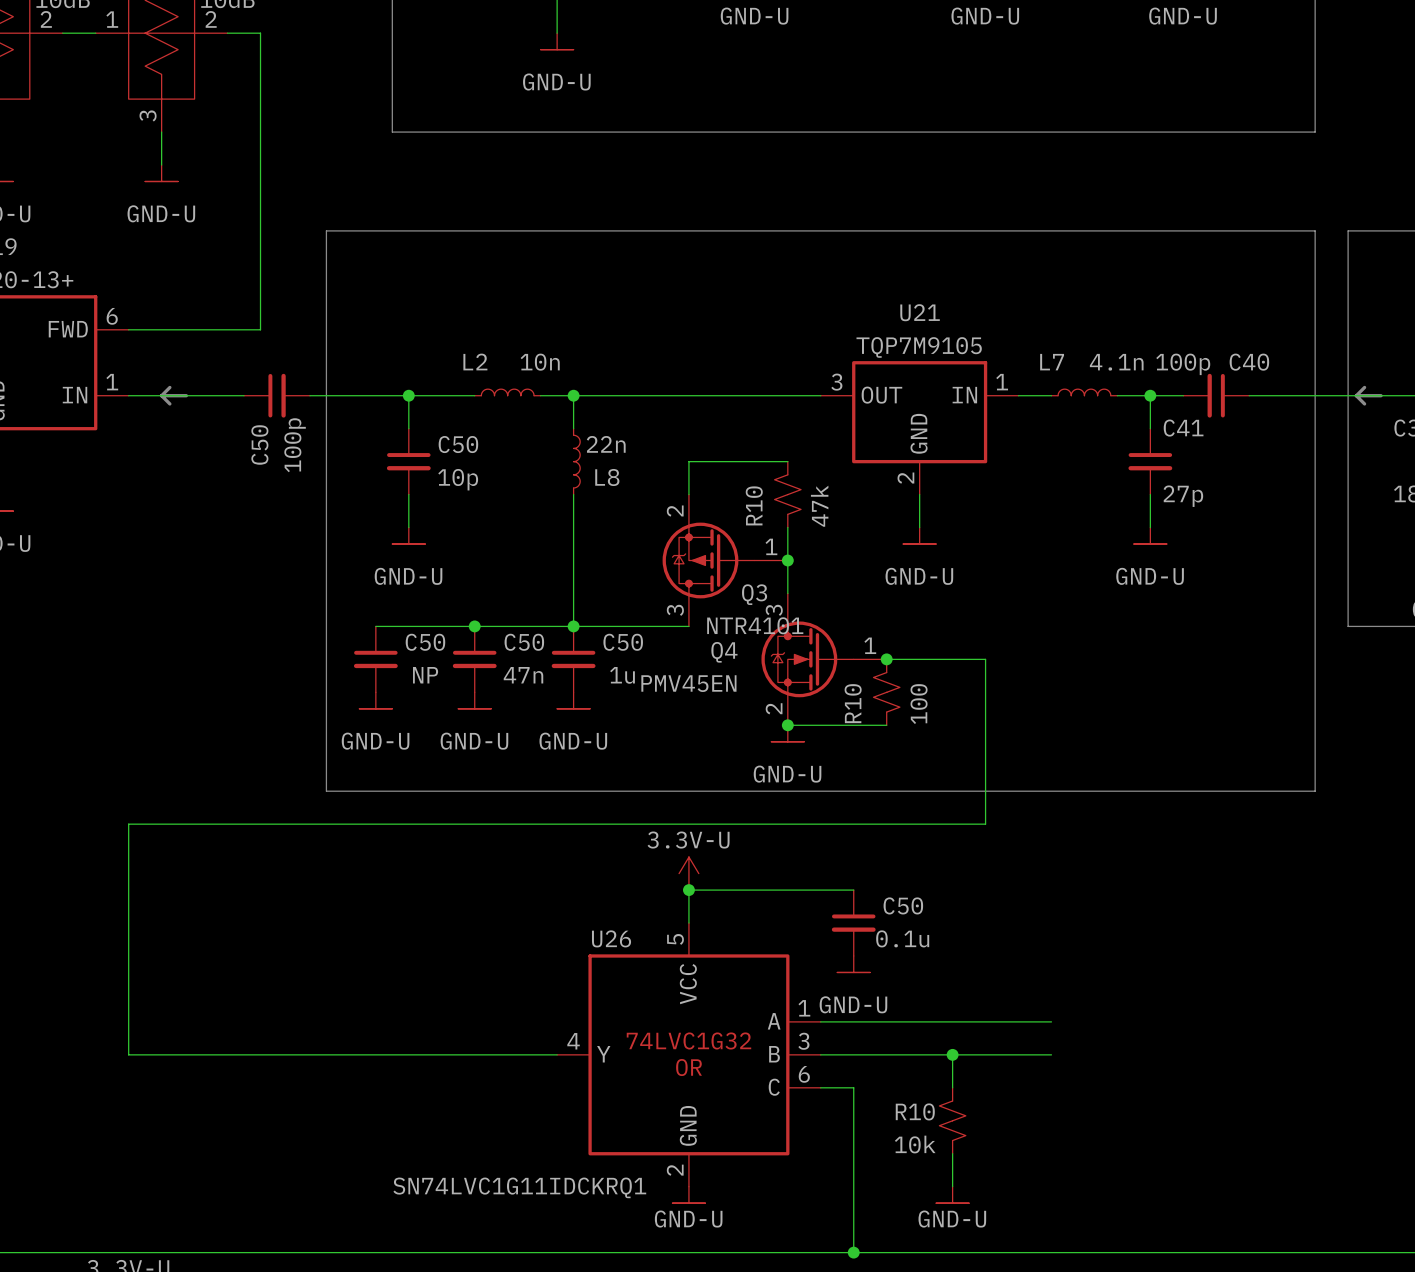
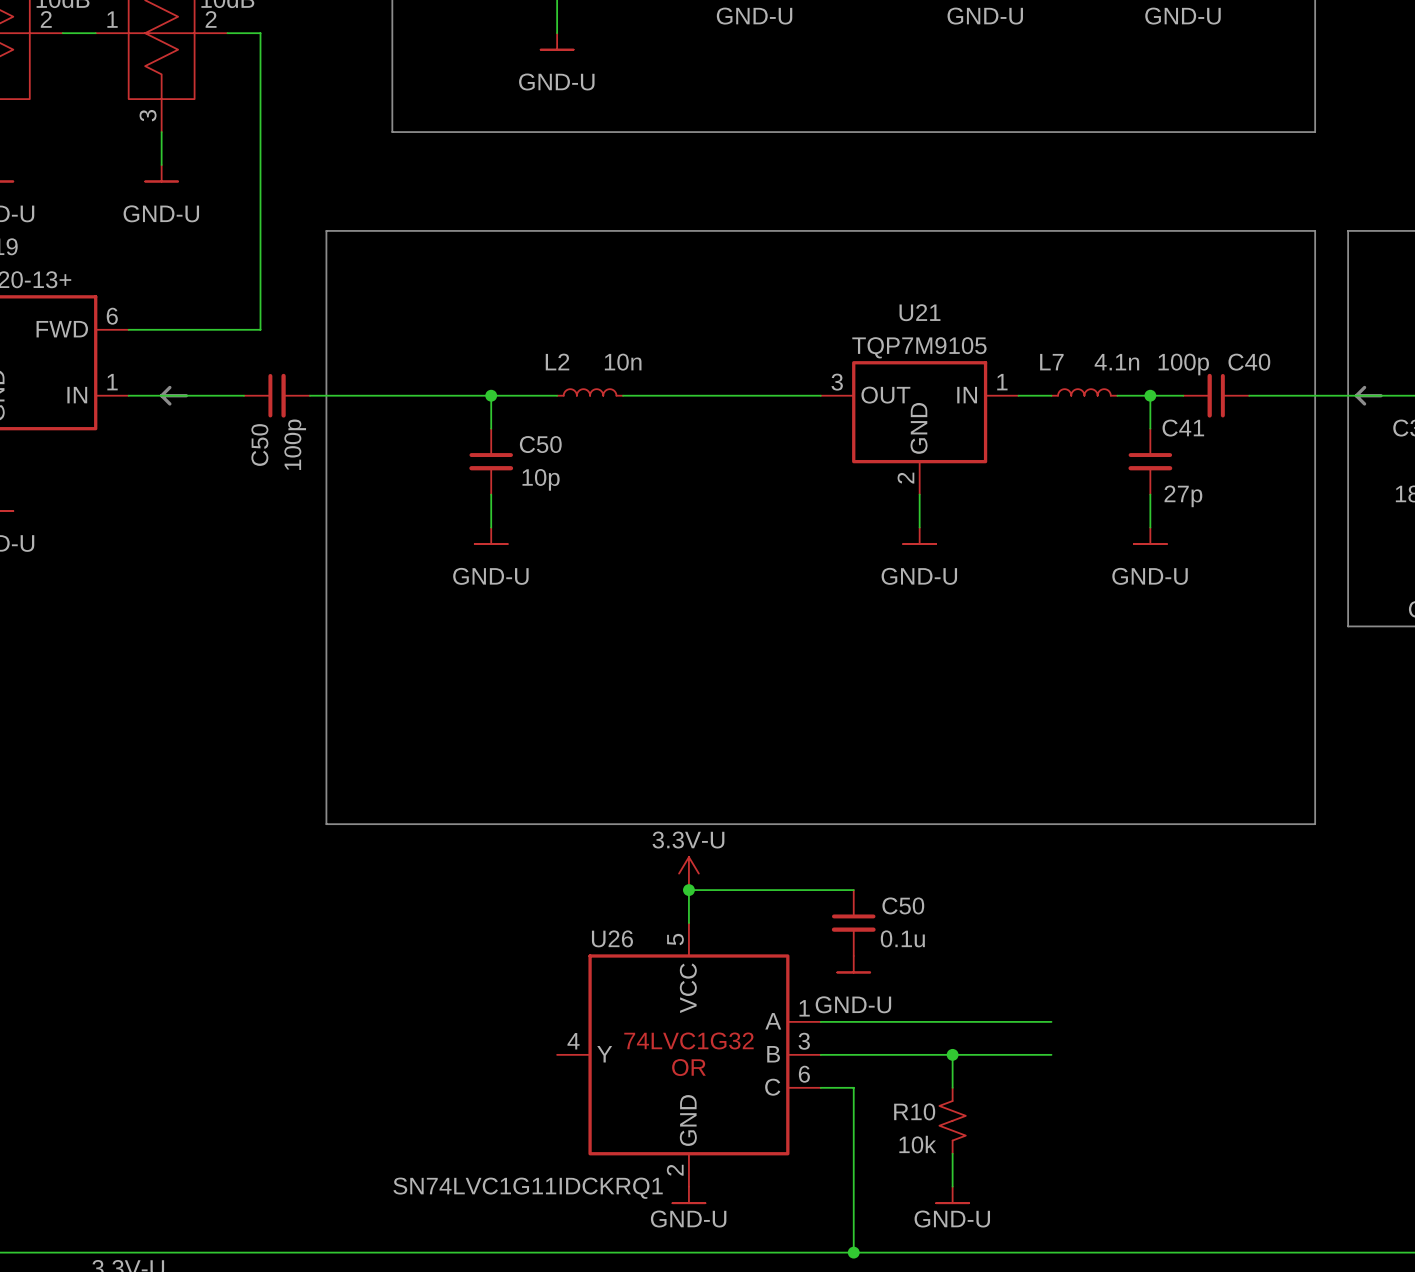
L2 position: (507, 392) -> (590, 392)
wire: (408, 395) (408, 428) -> (491, 395) (491, 428)
junction: (408, 395) -> none
junction: none -> (491, 395)
wire: (557, 395) (623, 395) -> (474, 395) (540, 395)
wire: (573, 395) (573, 428) -> none
junction: (573, 395) -> none
C50 position: (408, 461) -> (491, 461)
L8: 22n (576, 461) -> none
wire: (787, 461) (688, 461) (688, 494) -> none
wire: (408, 494) (408, 527) -> (491, 494) (491, 527)
wire: (573, 494) (573, 626) -> none
R10: 47k (787, 494) -> none
wire: (787, 527) (787, 593) -> none
power symbol position: GND-U (408, 535) -> GND-U (491, 535)
Q3: NTR4101 (725, 560) -> none
junction: (787, 560) -> none
wire: (375, 626) (688, 626) -> none
junction: (474, 626) -> none
junction: (573, 626) -> none
C50: NP (375, 659) -> none
C50: 47n (474, 659) -> none
C50: 1u (573, 659) -> none
Q4: PMV45EN (824, 659) -> none
wire: (886, 659) (985, 659) (985, 824) (128, 824) (128, 1054) (557, 1054) -> none
junction: (886, 659) -> none
R10: 100 (886, 692) -> none
power symbol: GND-U (375, 700) -> none
power symbol: GND-U (474, 700) -> none
power symbol: GND-U (573, 700) -> none
wire: (787, 725) (886, 725) -> none
junction: (787, 725) -> none
power symbol: GND-U (787, 733) -> none
line: (326, 791) (1315, 791) -> (326, 791) (326, 824) (1315, 824) (1315, 791)

